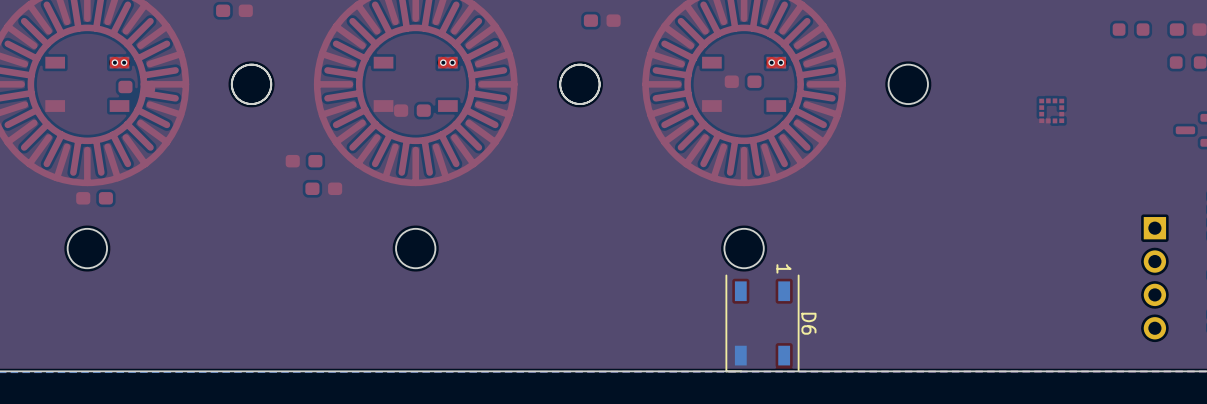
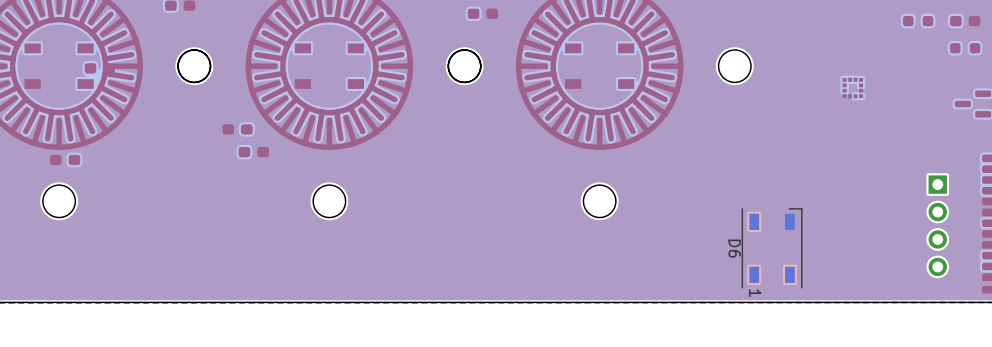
via: (114, 62) -> none
via: (124, 62) -> none
via: (443, 62) -> none
via: (452, 62) -> none
via: (771, 62) -> none
via: (780, 62) -> none
part: (743, 81) -> none
part: (412, 110) -> none
D6 rotation: 0° (762, 323) -> 180° (772, 248)
D6 position: (762, 323) -> (772, 248)

